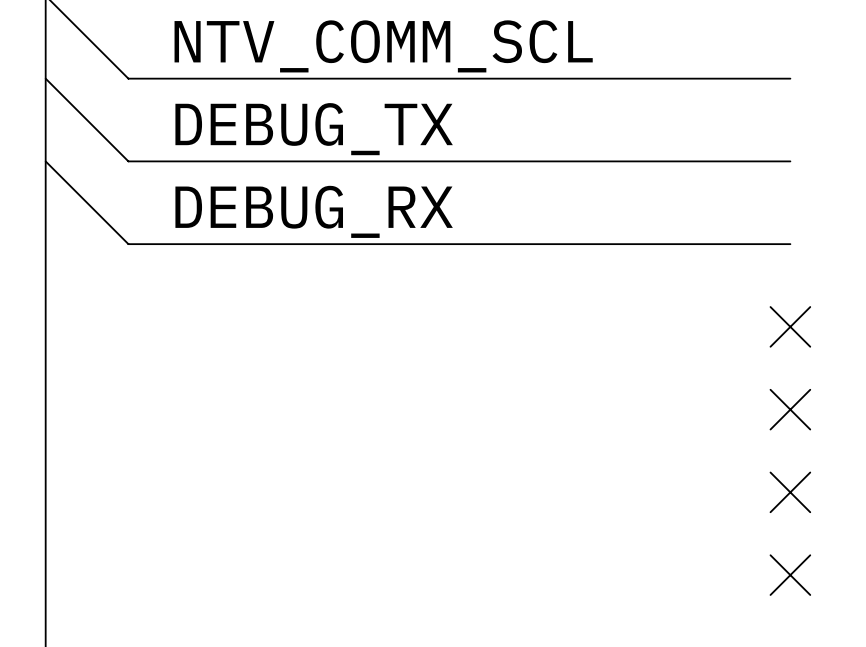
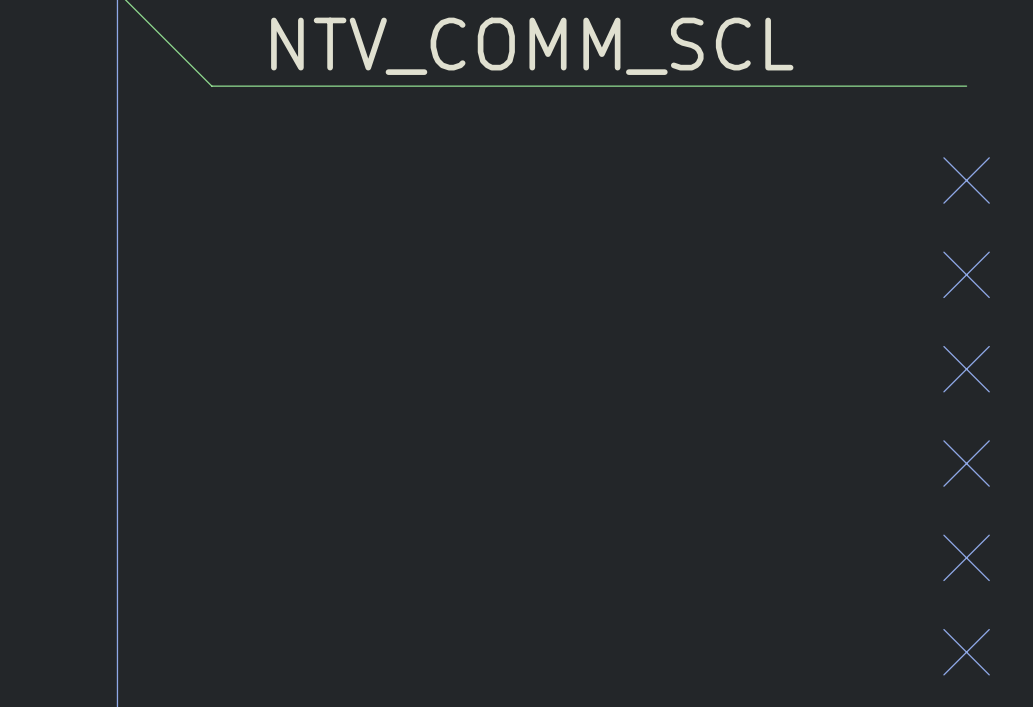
wire: (45, 78) (128, 161) (790, 161) -> none
label: DEBUG_TX (314, 129) -> none
wire: (45, 161) (128, 244) (790, 244) -> none
no-connect mark: none -> (966, 180)
label: DEBUG_RX (314, 211) -> none
no-connect mark: none -> (966, 274)

